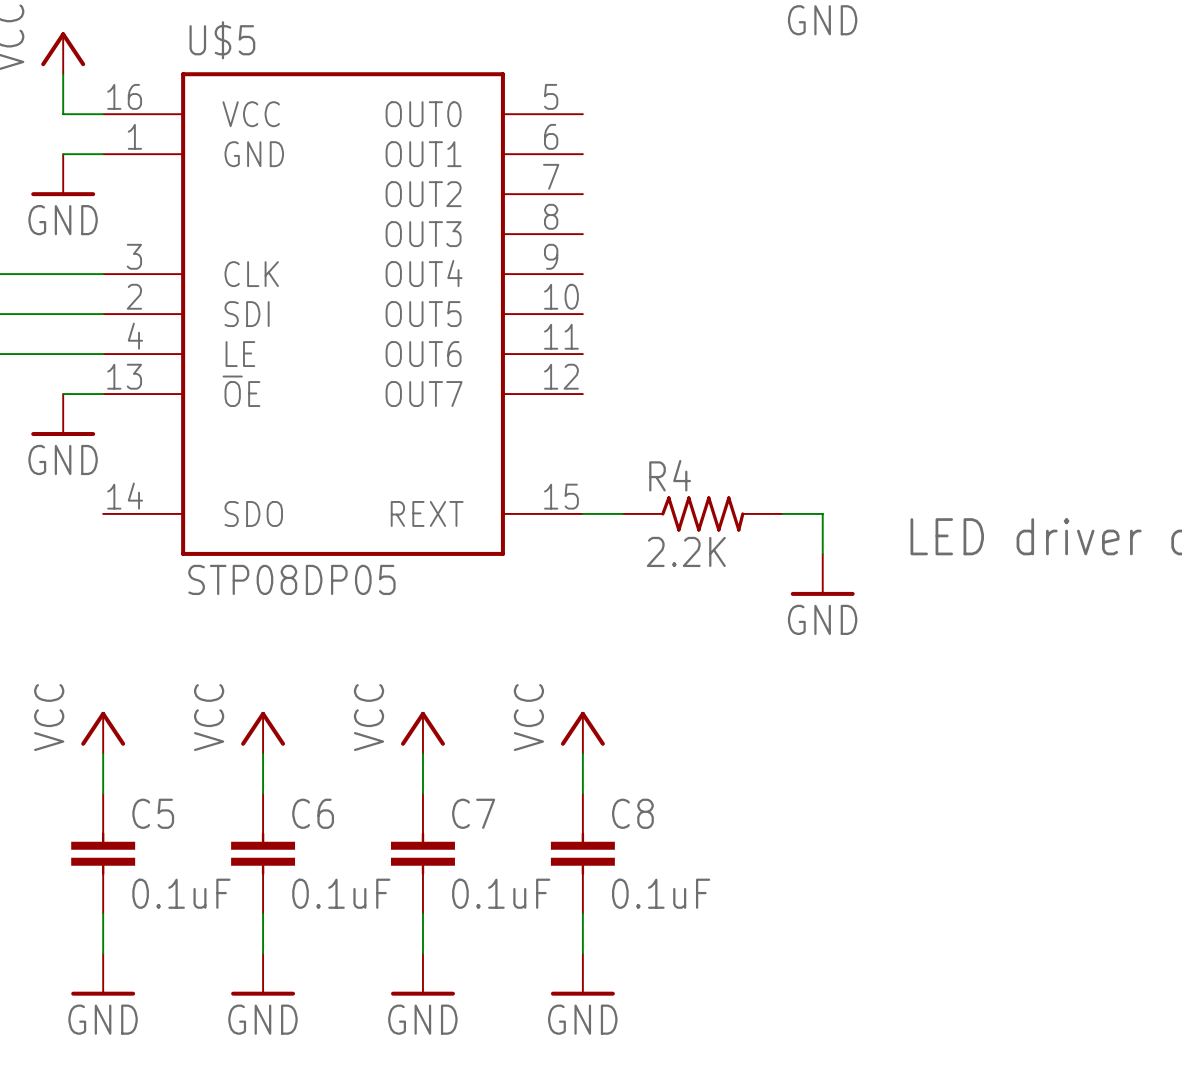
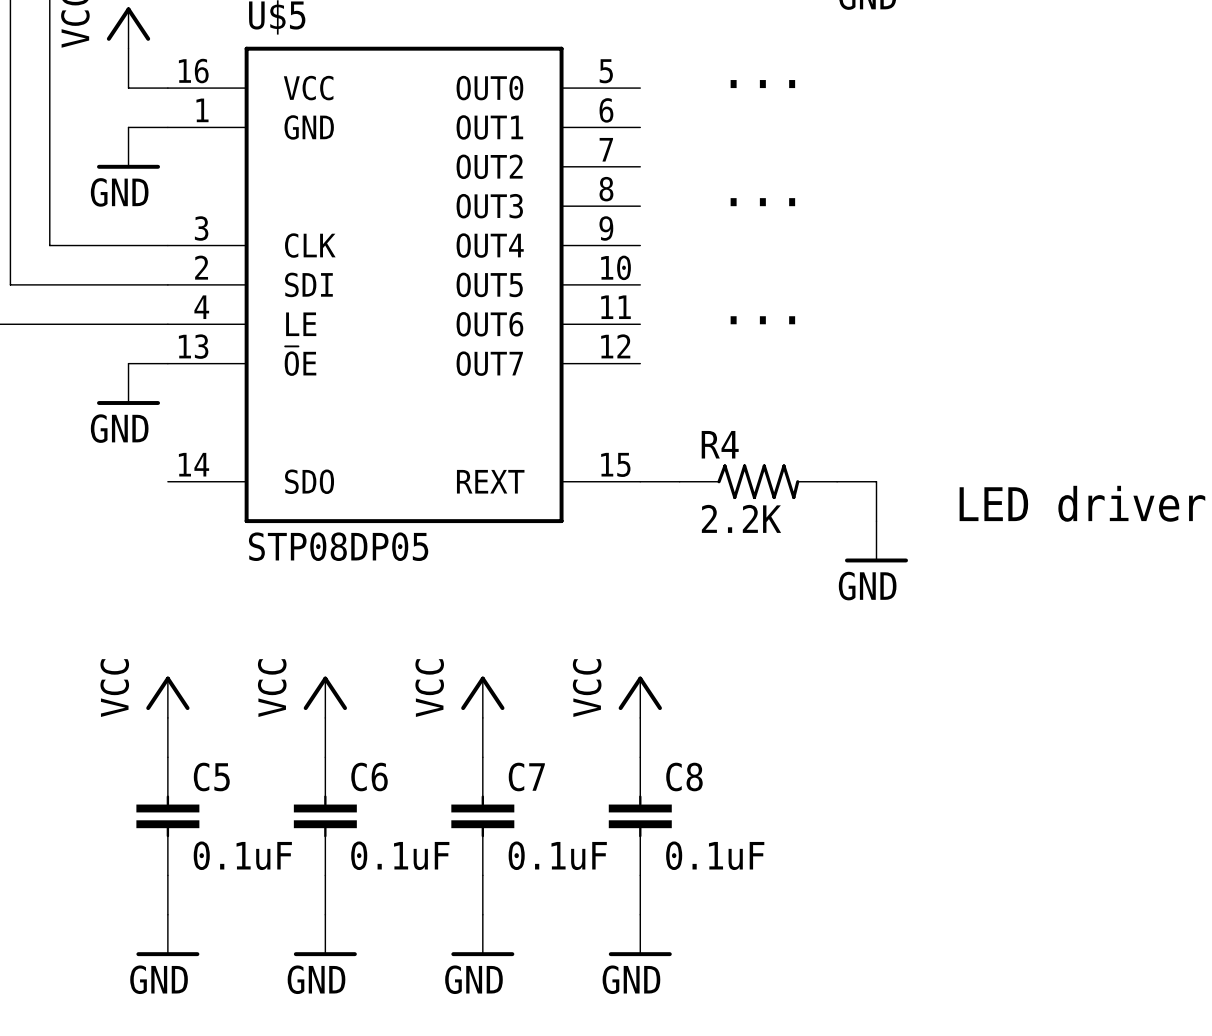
text: none -> ... (762, 84)
text: none -> ... (762, 202)
text: none -> ... (762, 320)

